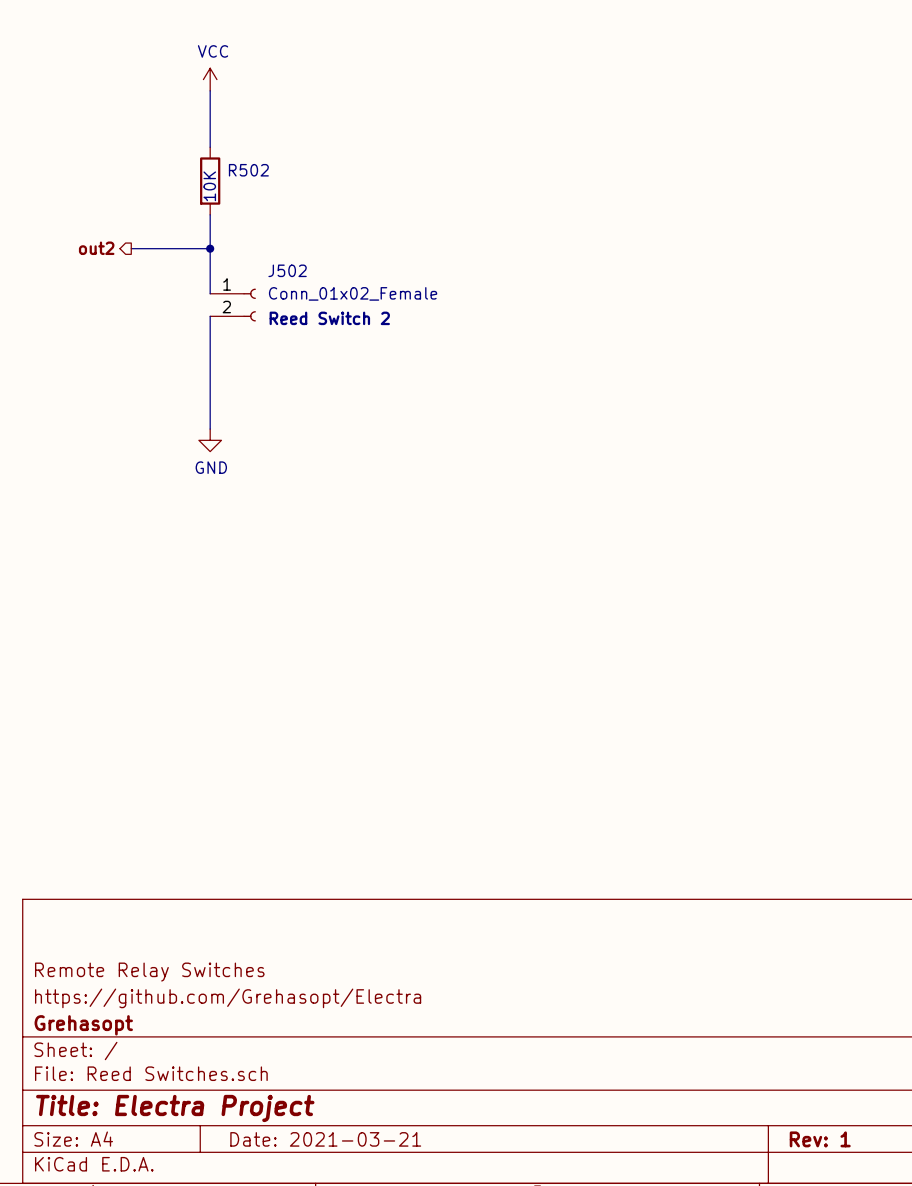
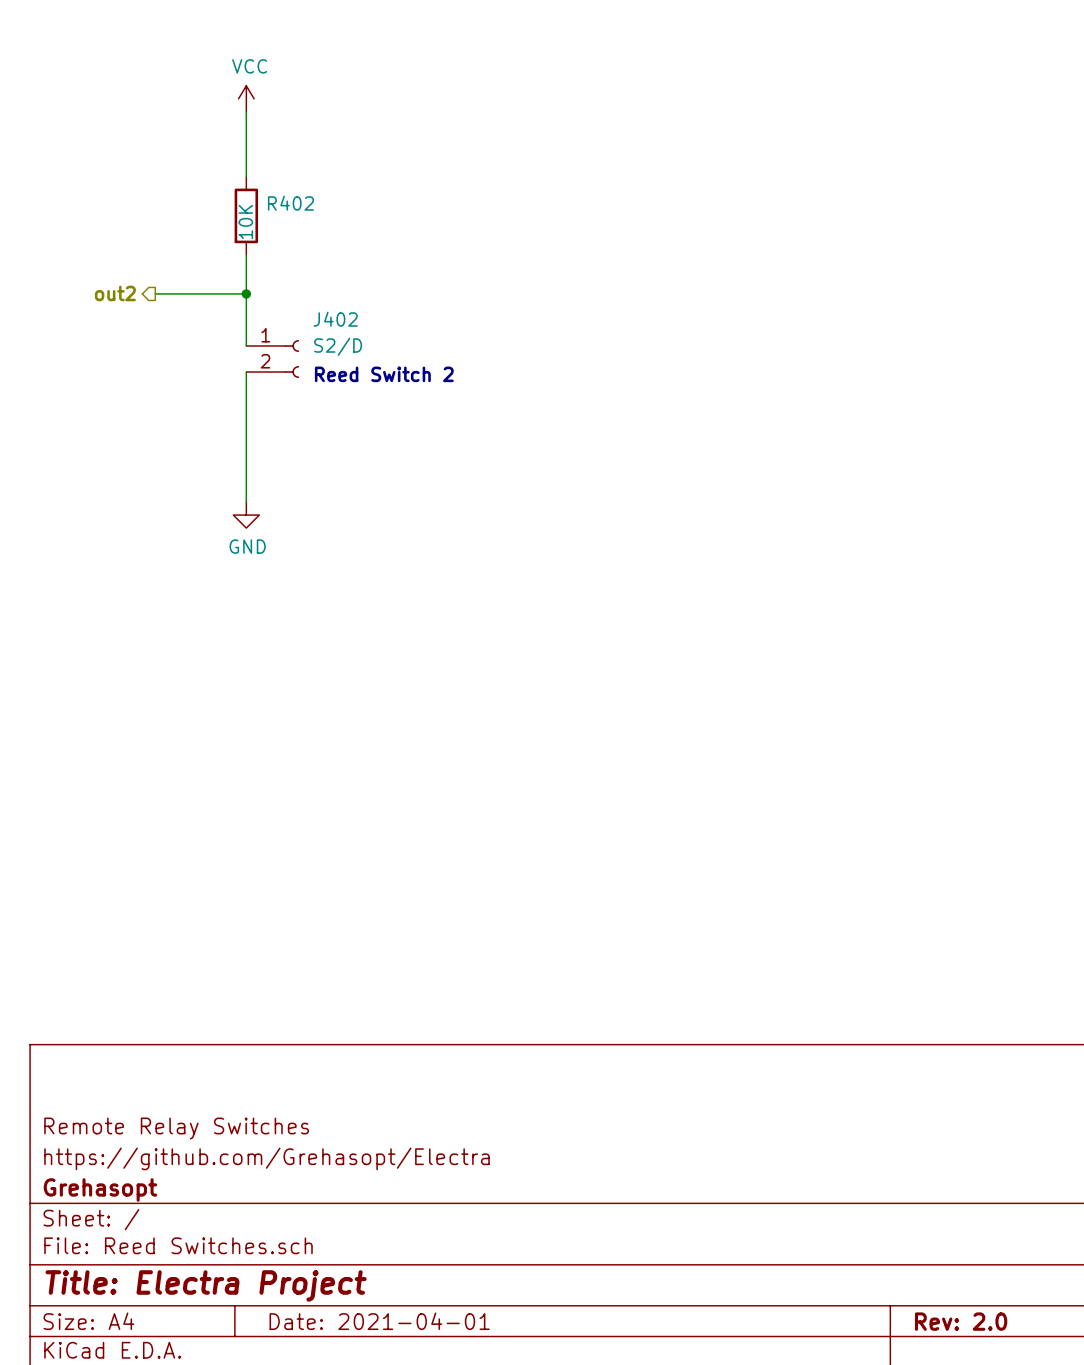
R502 name: R502 (248, 170) -> R402 (290, 203)
J502 name: J502 (287, 270) -> J402 (335, 319)
J502 value: Conn_01x02_Female (353, 293) -> S2/D (338, 346)
title block: Date: 2021-03-21 (325, 1139) -> Date: 2021-04-01 (379, 1321)
title block: Rev: 1 (820, 1139) -> Rev: 2.0 (961, 1321)

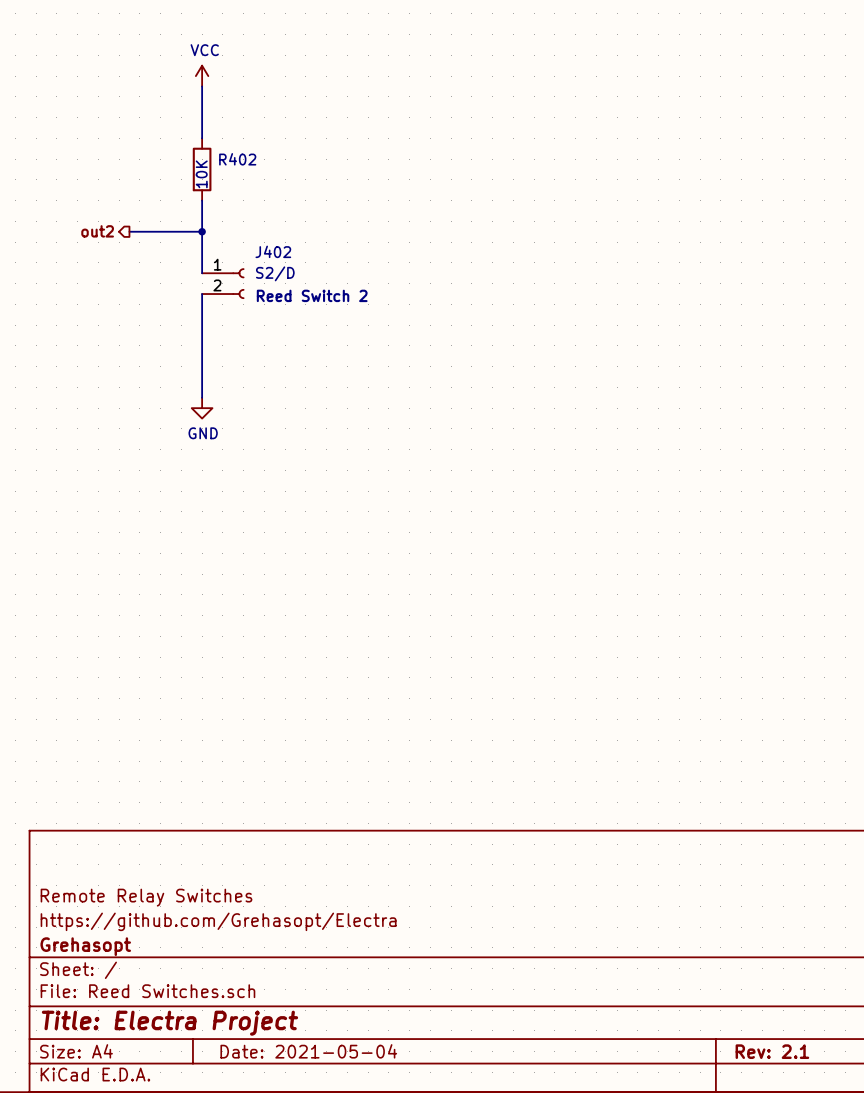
title block: Date: 2021-04-01 (379, 1321) -> Date: 2021-05-04 (308, 1051)
title block: Rev: 2.0 (961, 1321) -> Rev: 2.1 (772, 1051)

